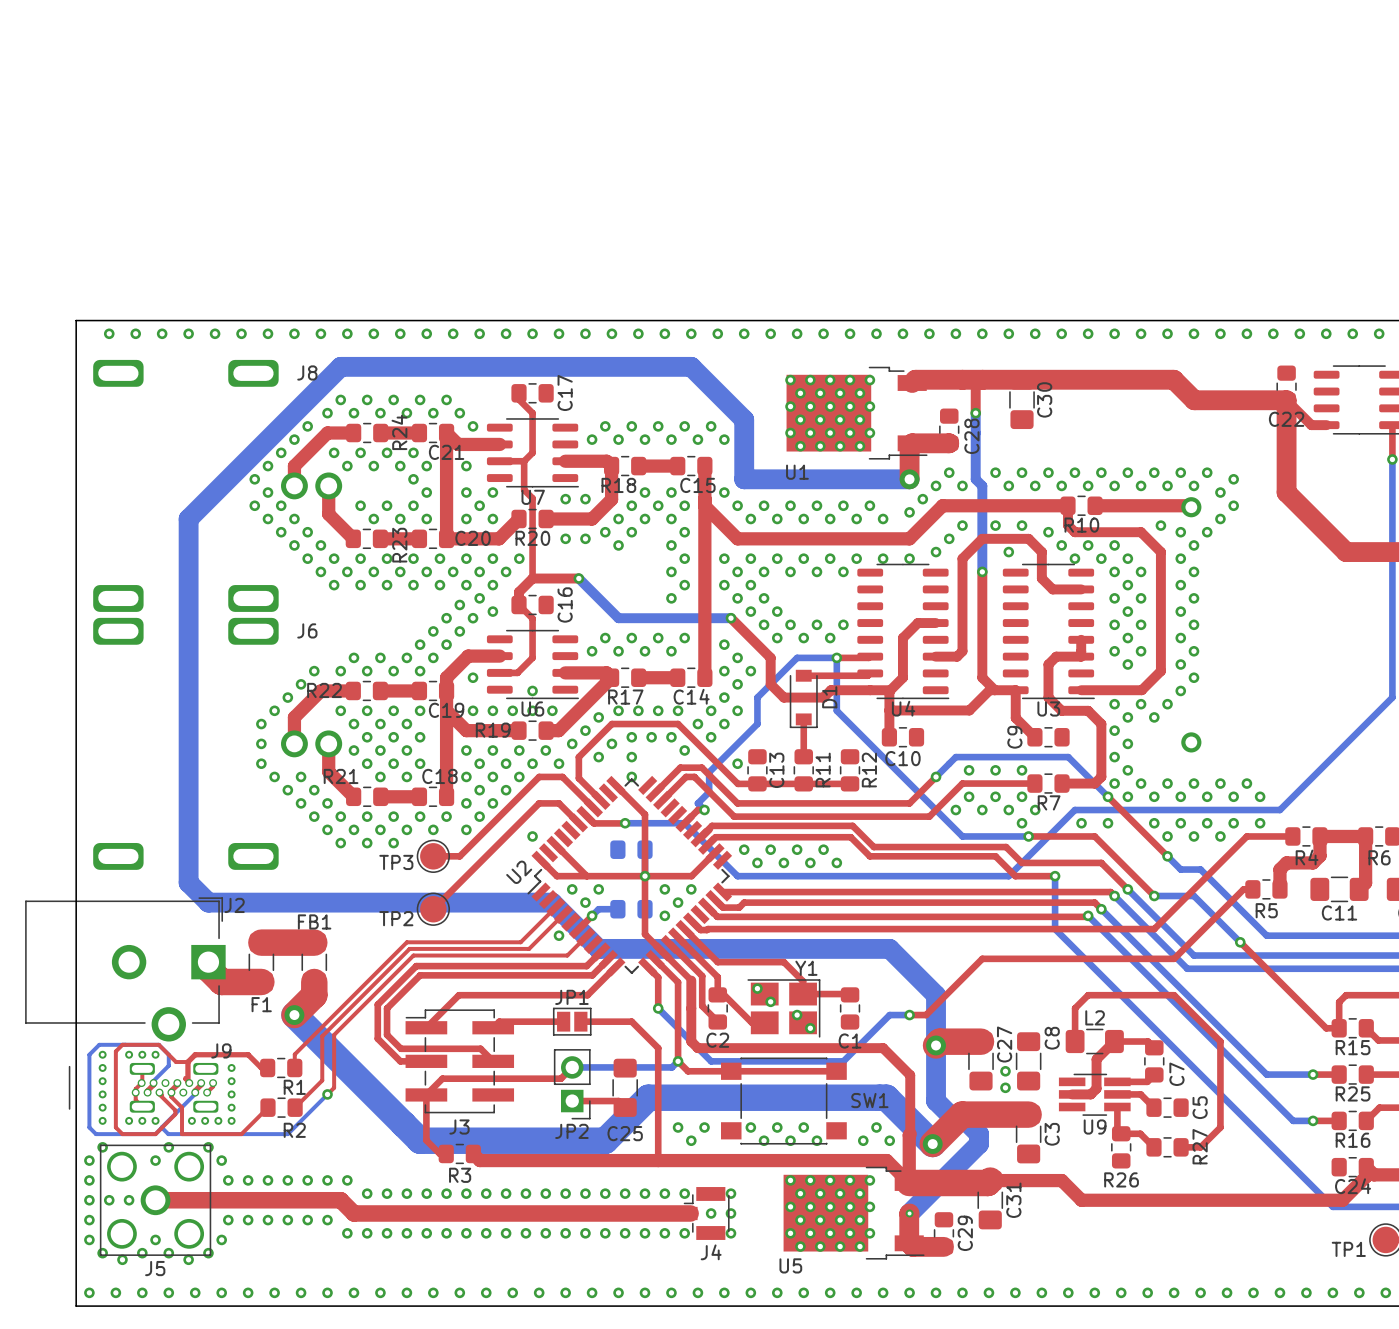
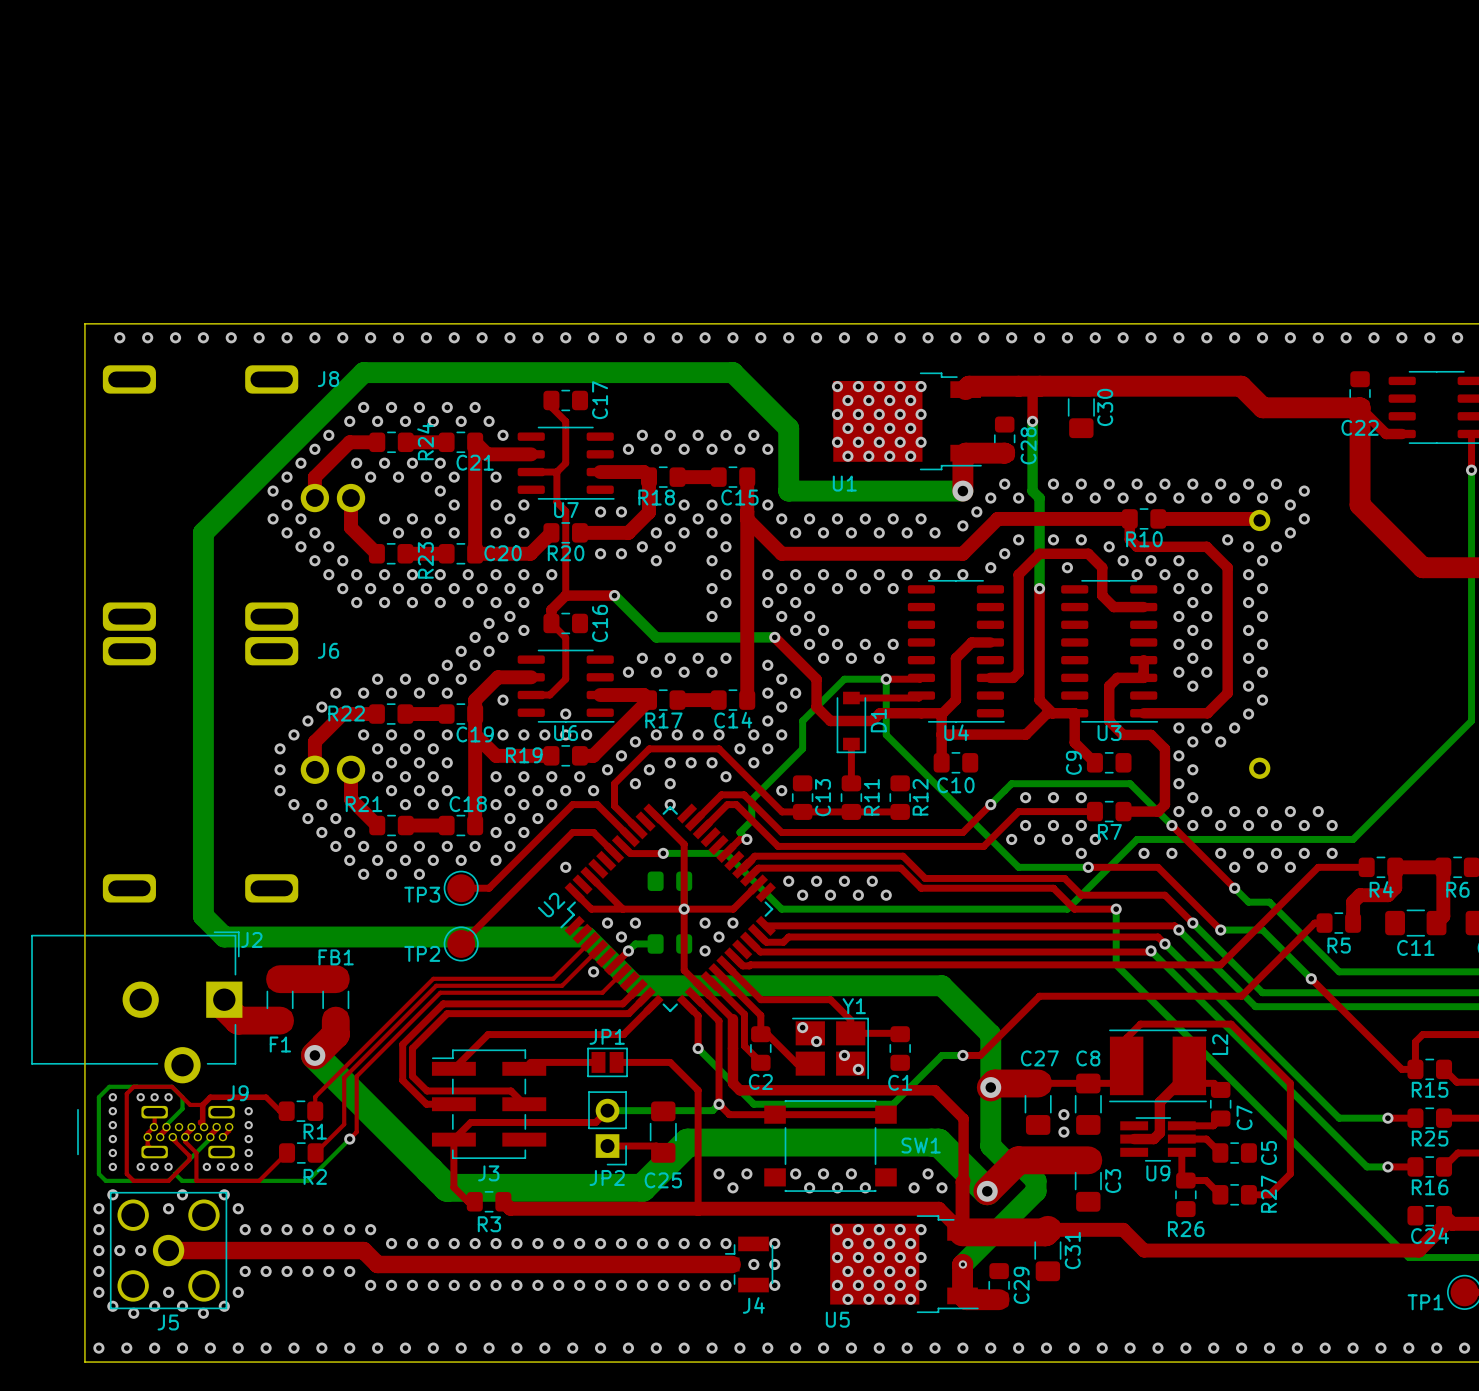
top track: (1174, 995) (1088, 995) (1075, 1008) (1075, 1041) -> (1241, 1034) (1231, 1024) (1140, 1024) (1126, 1038) (1126, 1072) (1116, 1083) (994, 1083) (990, 1087)
L2 name position: L2 (1095, 1017) -> L2 (1220, 1044)
L2 footprint: [1065, 1028, 1124, 1055] -> [1109, 1029, 1207, 1103]
C8 name rotation: 0° (1052, 1038) -> 90° clockwise (1088, 1058)
C27 name rotation: 0° (1004, 1044) -> 90° clockwise (1039, 1058)

